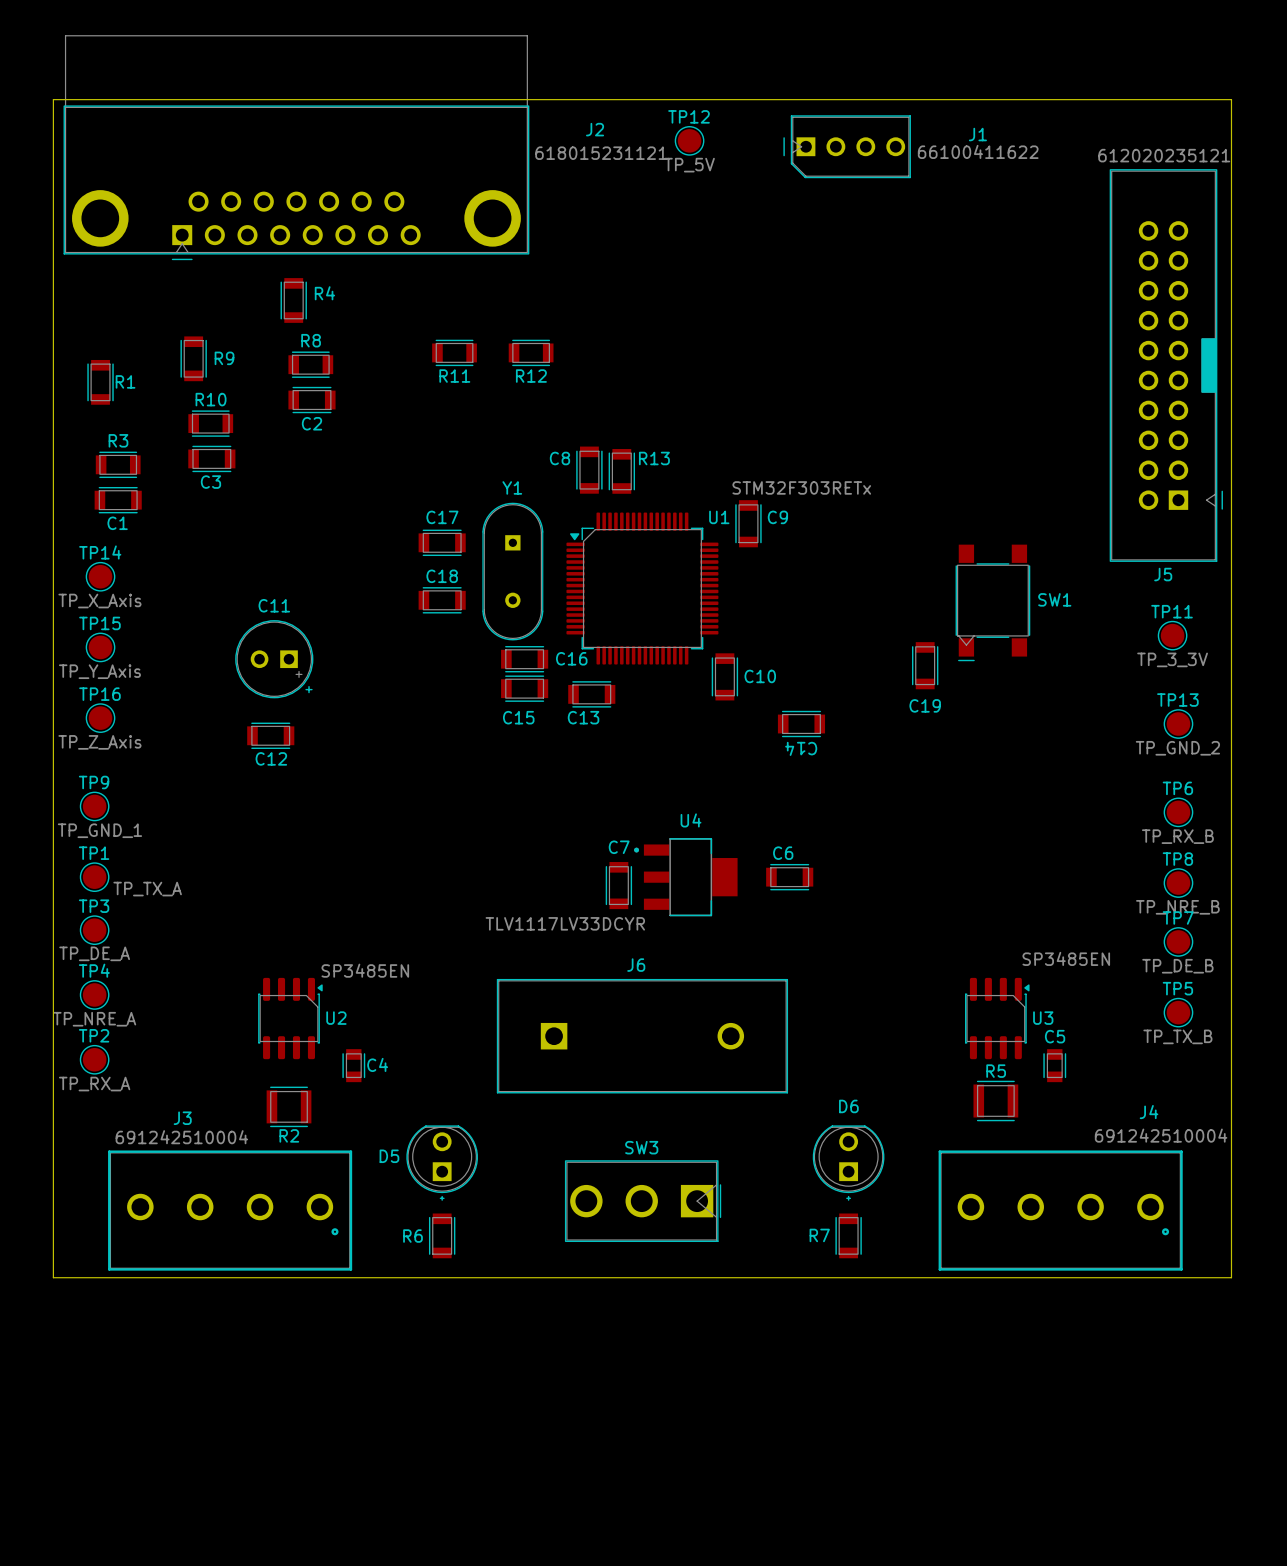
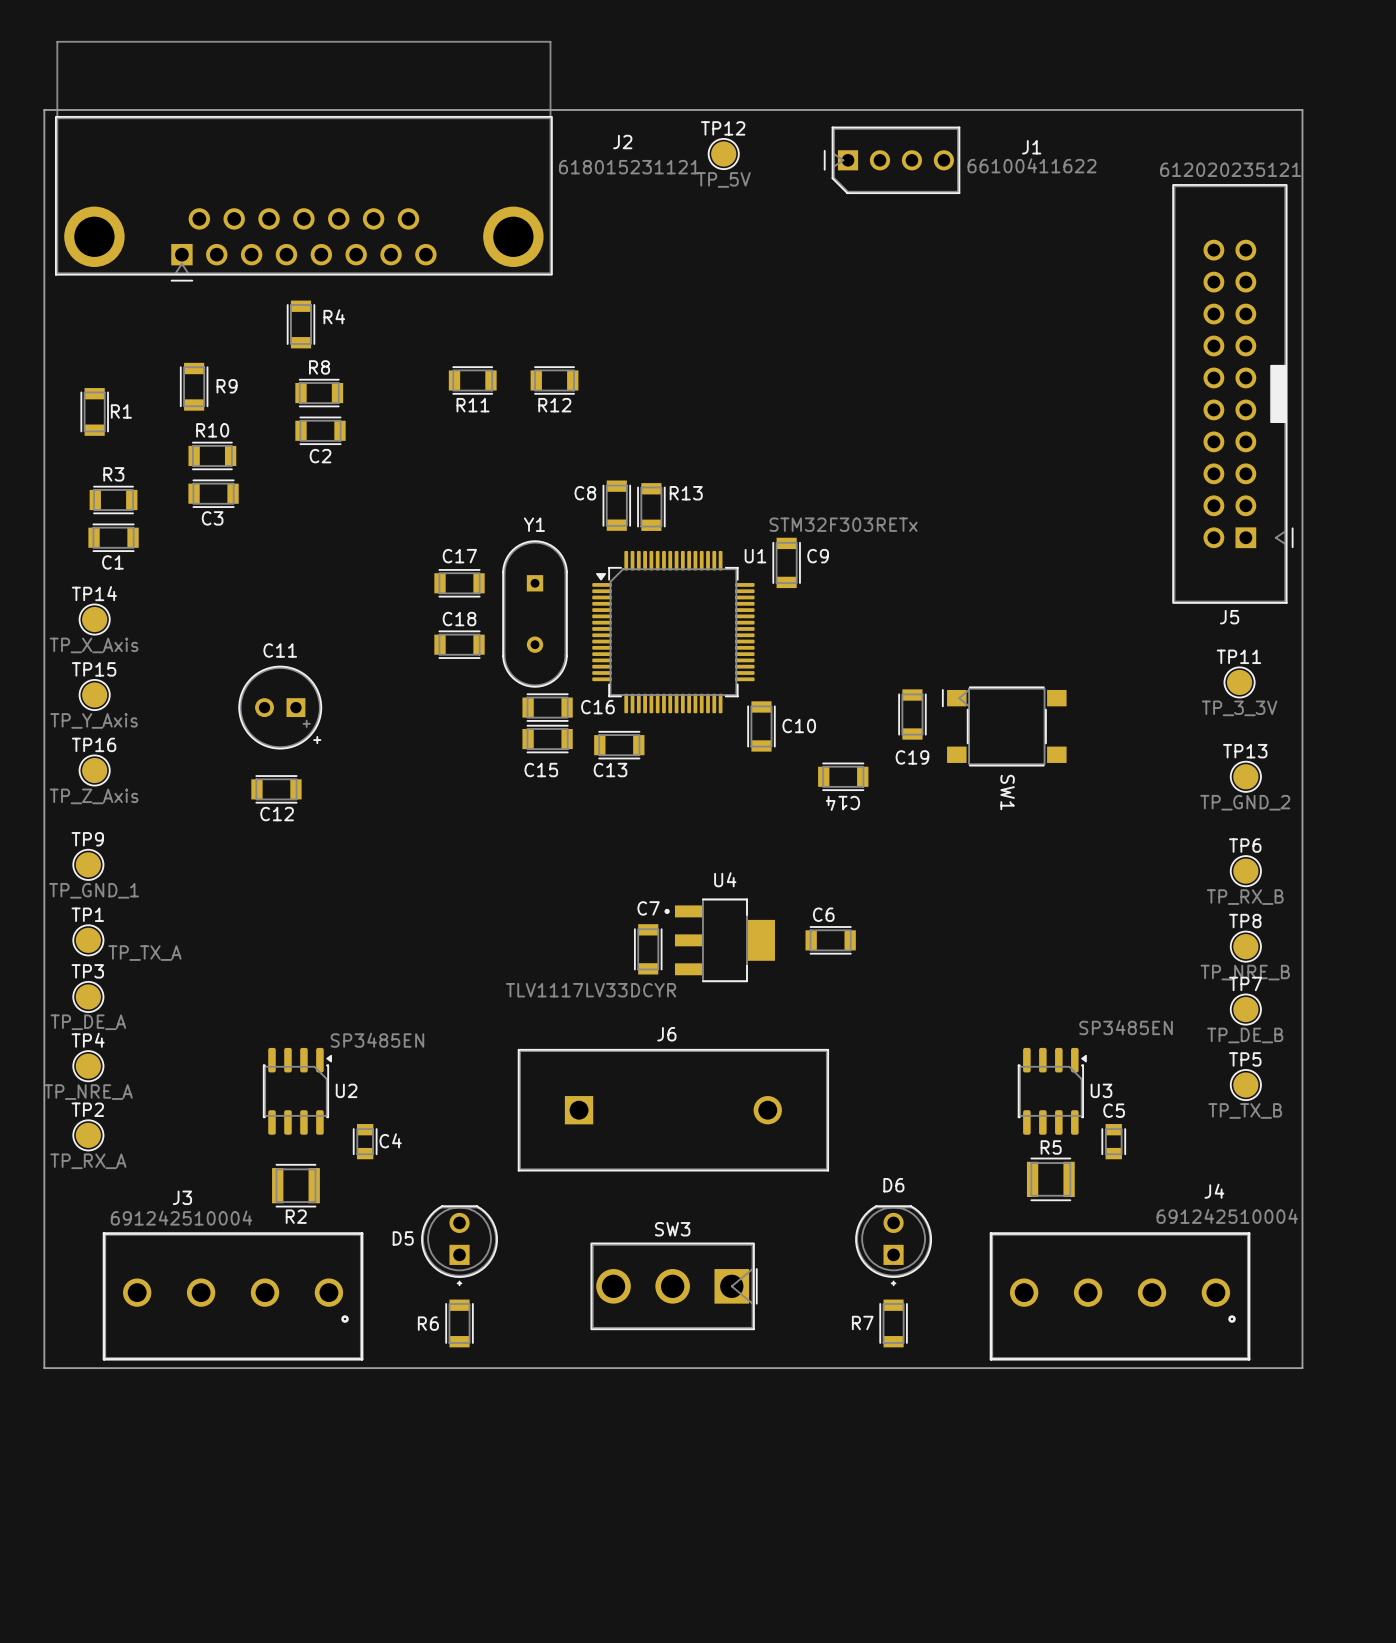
SW1 rotation: 0° (992, 602) -> 90° clockwise (1004, 726)
SW1 position: (992, 602) -> (1004, 726)
C19 position: (925, 665) -> (912, 714)

